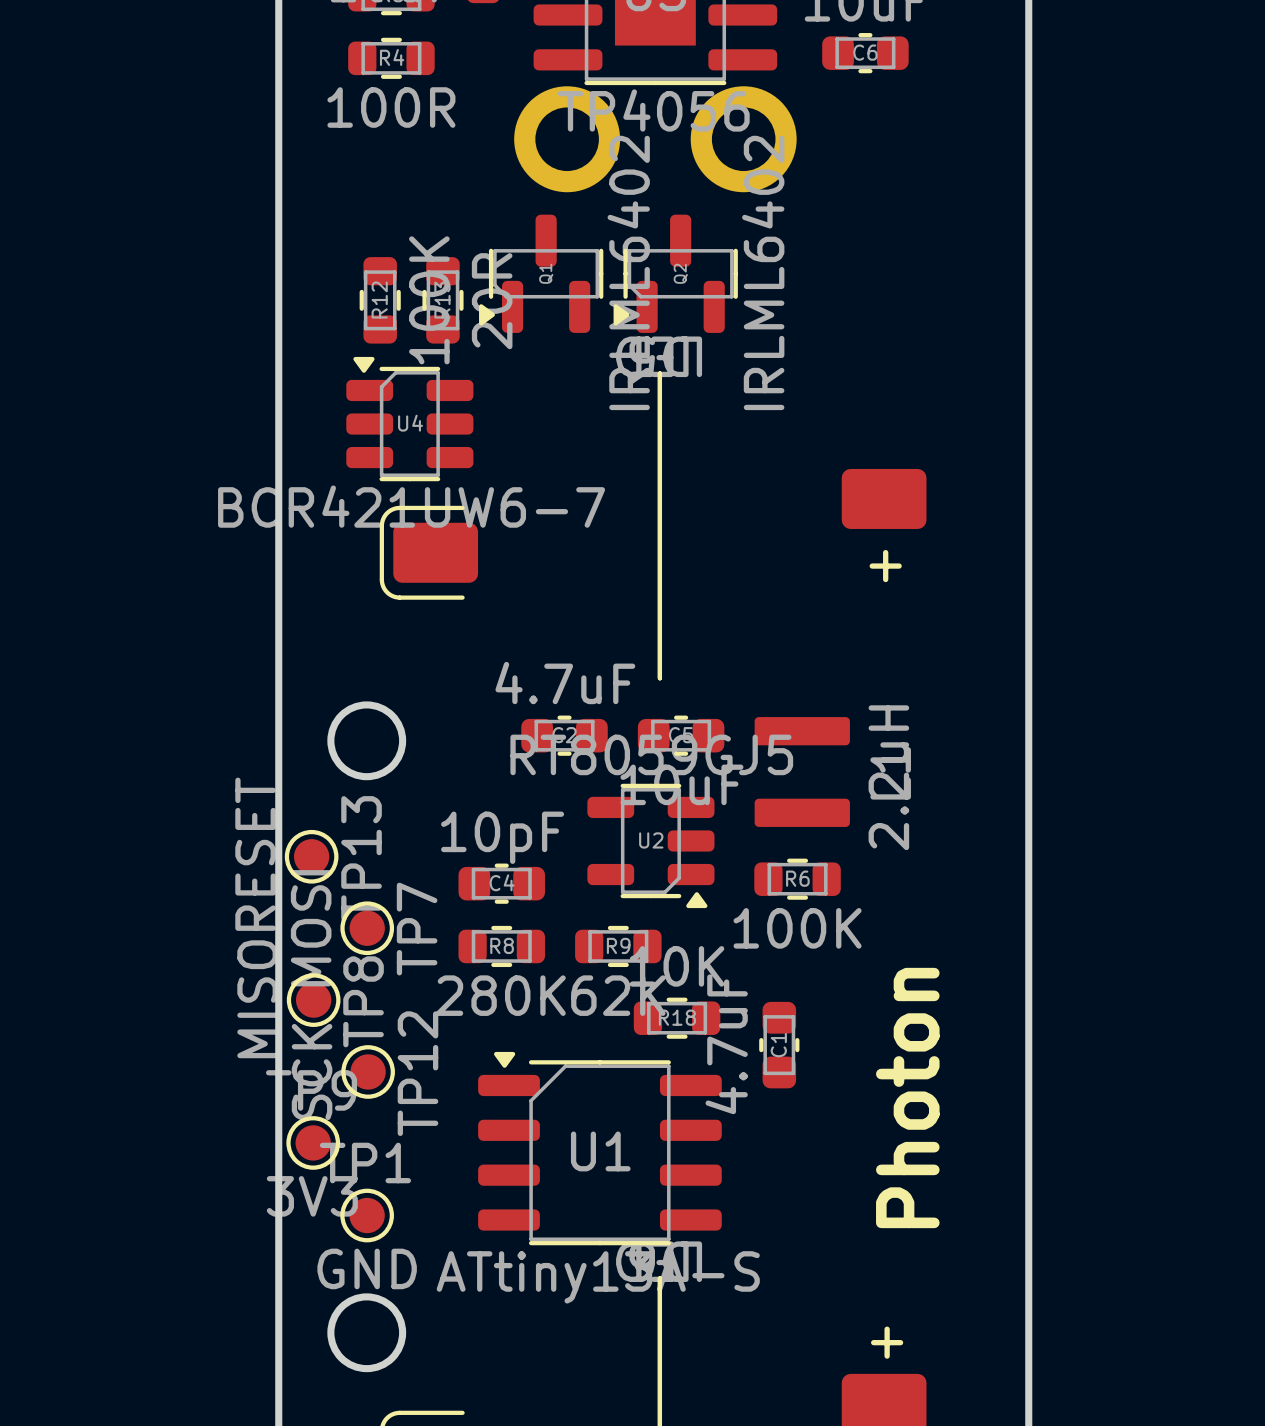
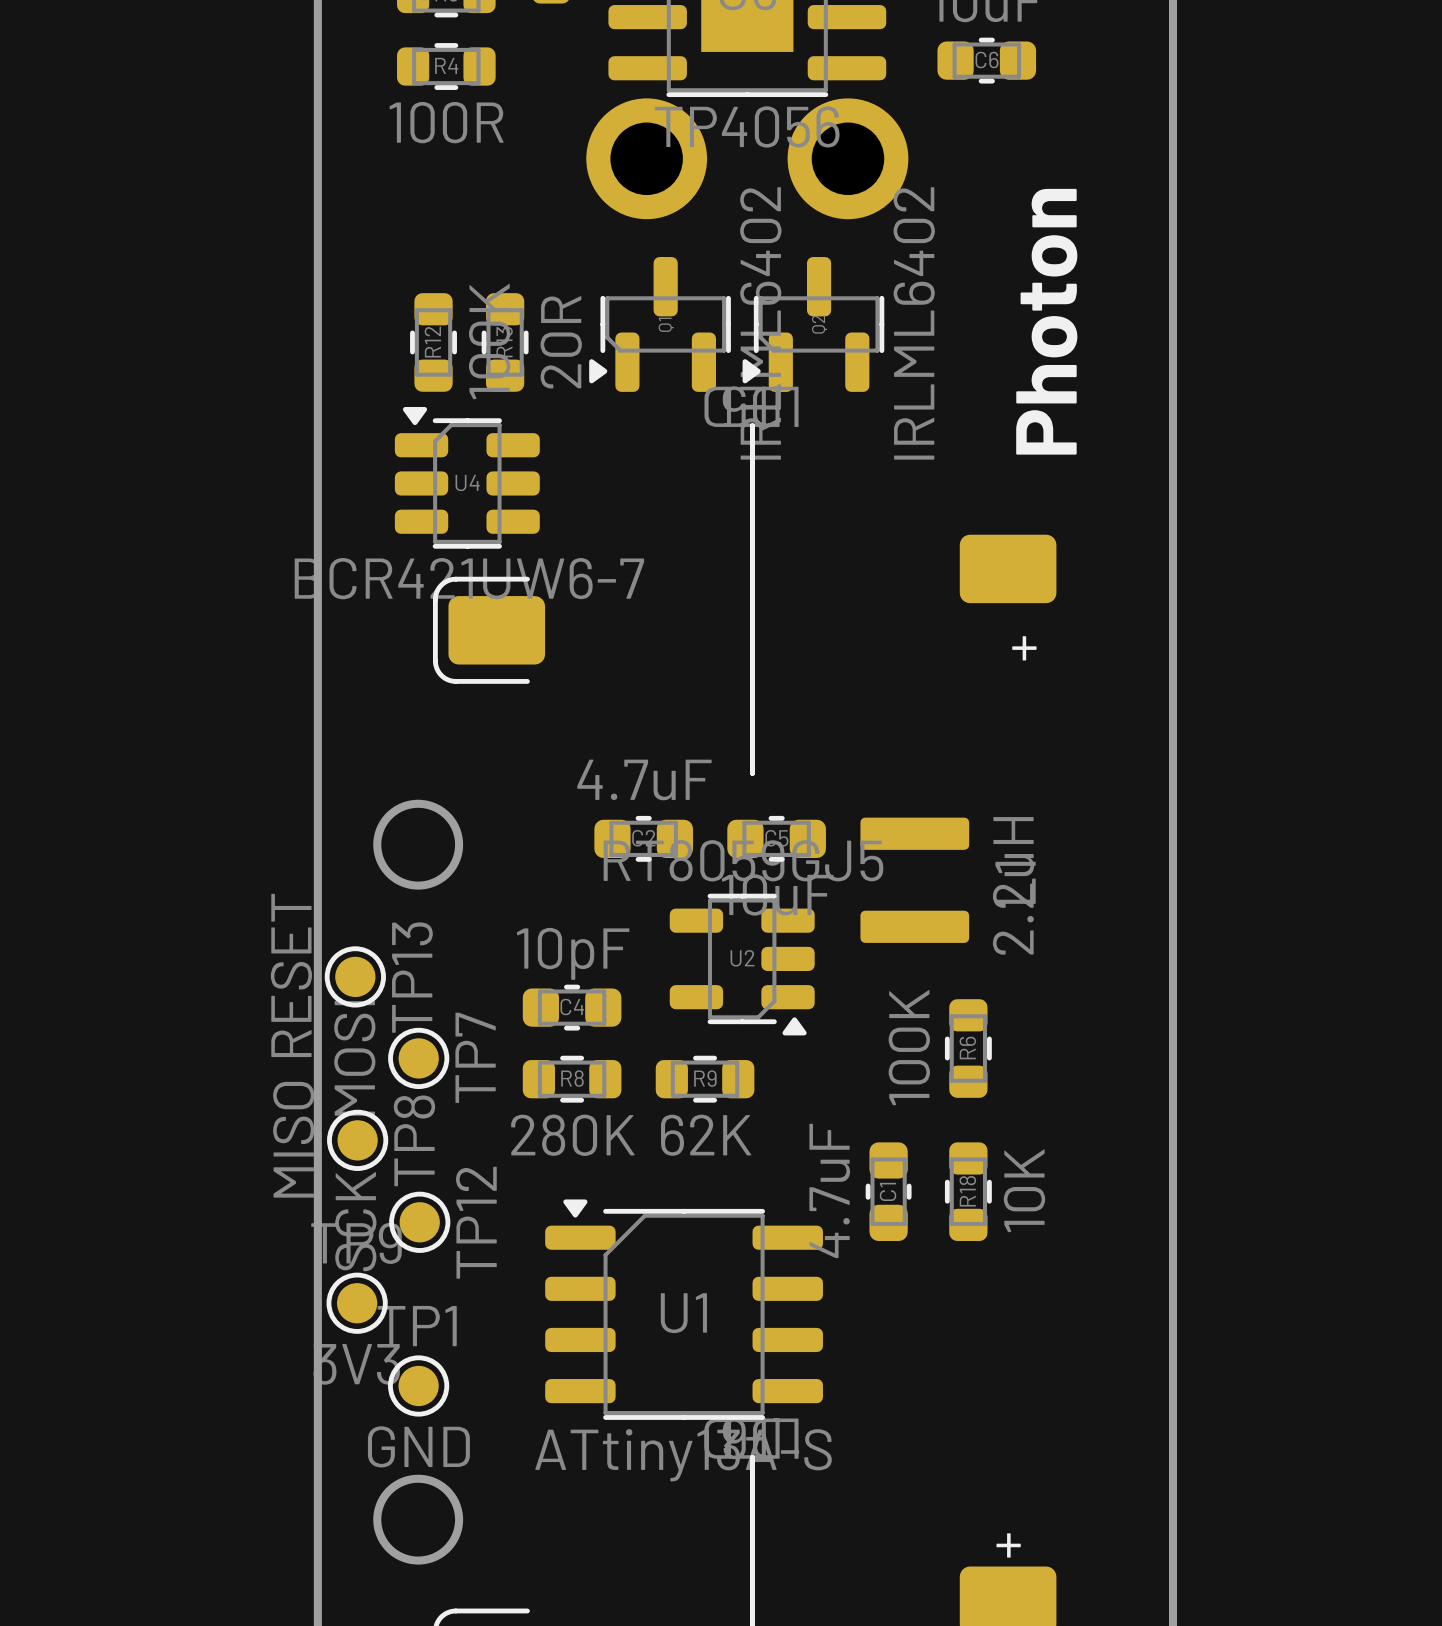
Q1 position: (541, 273) -> (660, 324)
Q2 position: (675, 273) -> (813, 324)
R6 rotation: 0° (797, 879) -> 90° clockwise (968, 1048)
R6 position: (797, 879) -> (968, 1048)
R18 rotation: 0° (677, 1018) -> 90° clockwise (968, 1191)
R18 position: (677, 1018) -> (968, 1191)
text position: Photon (907, 1098) -> Photon (1046, 321)

